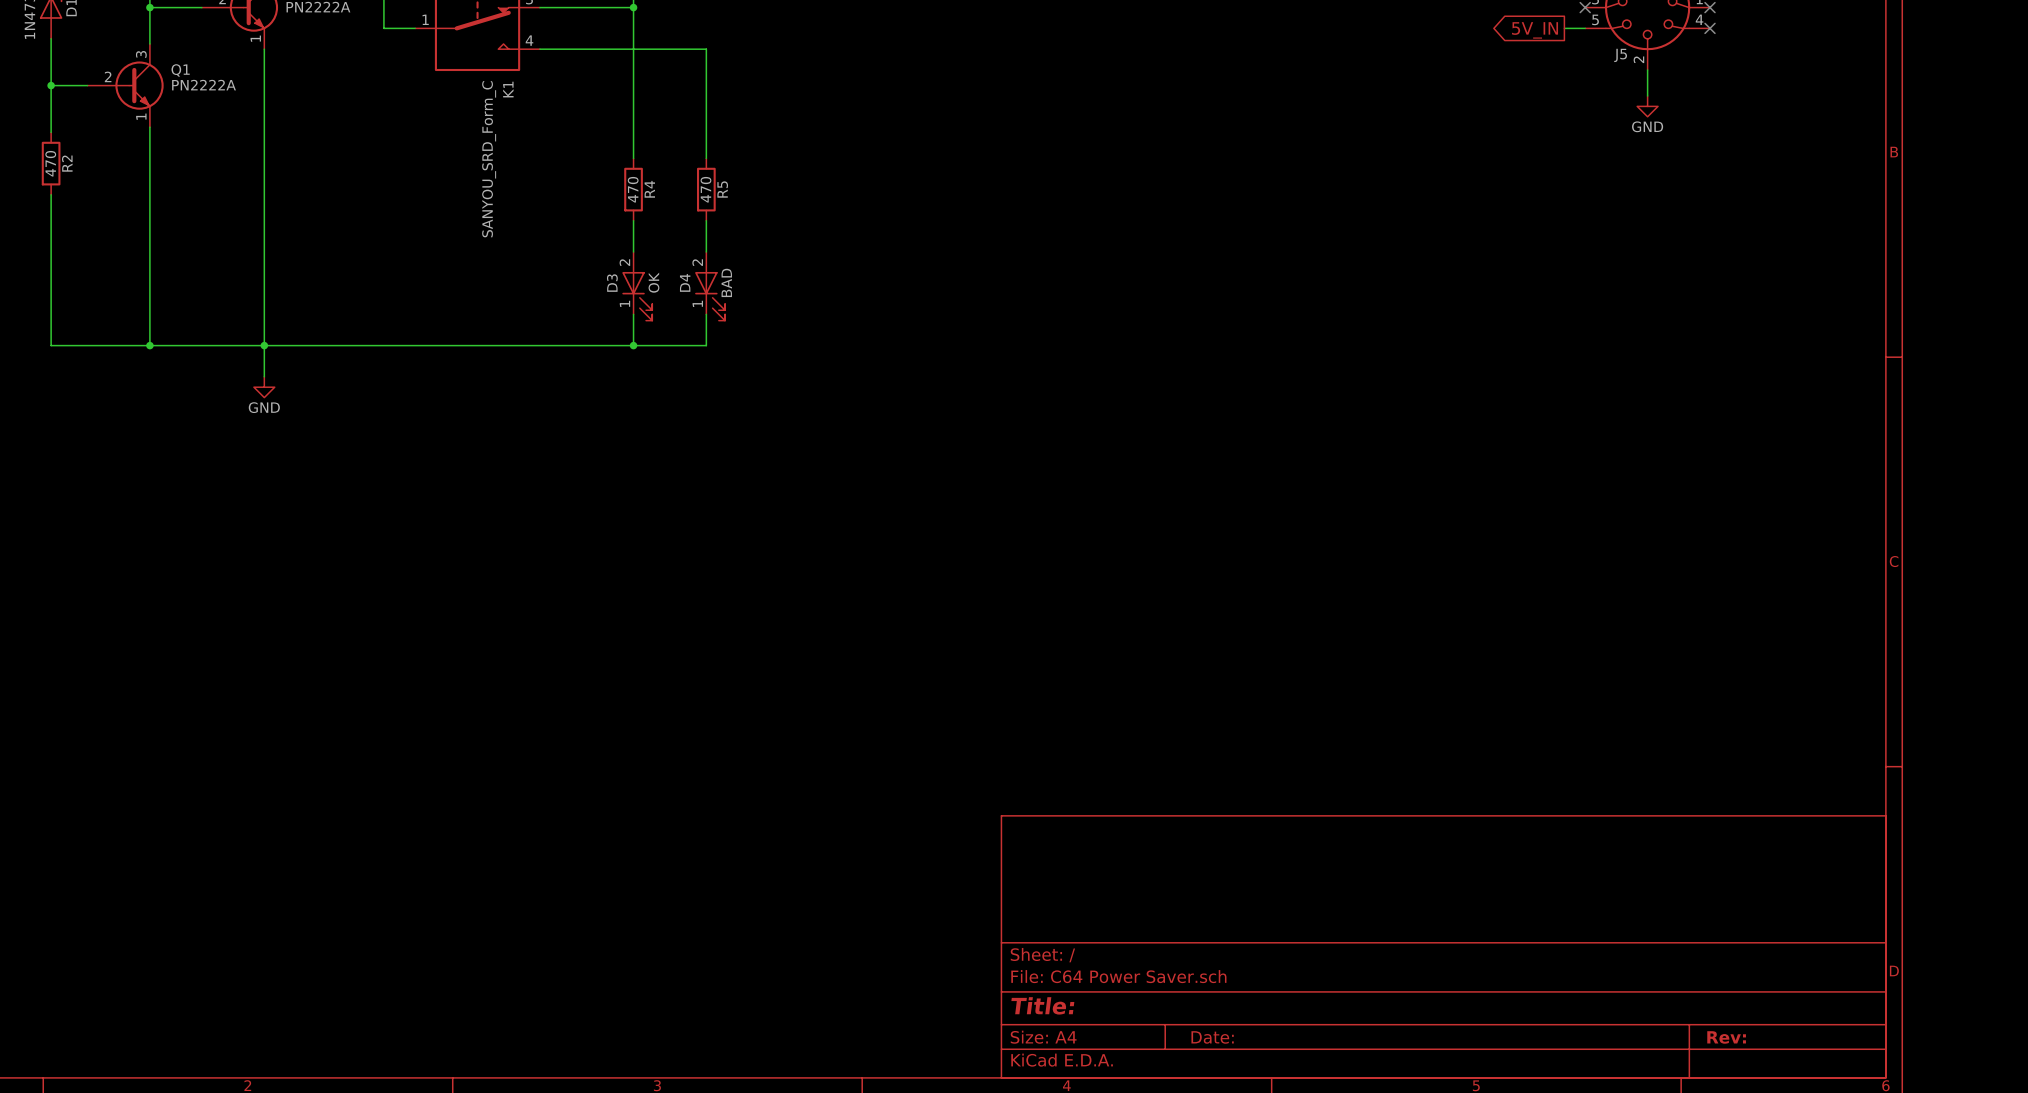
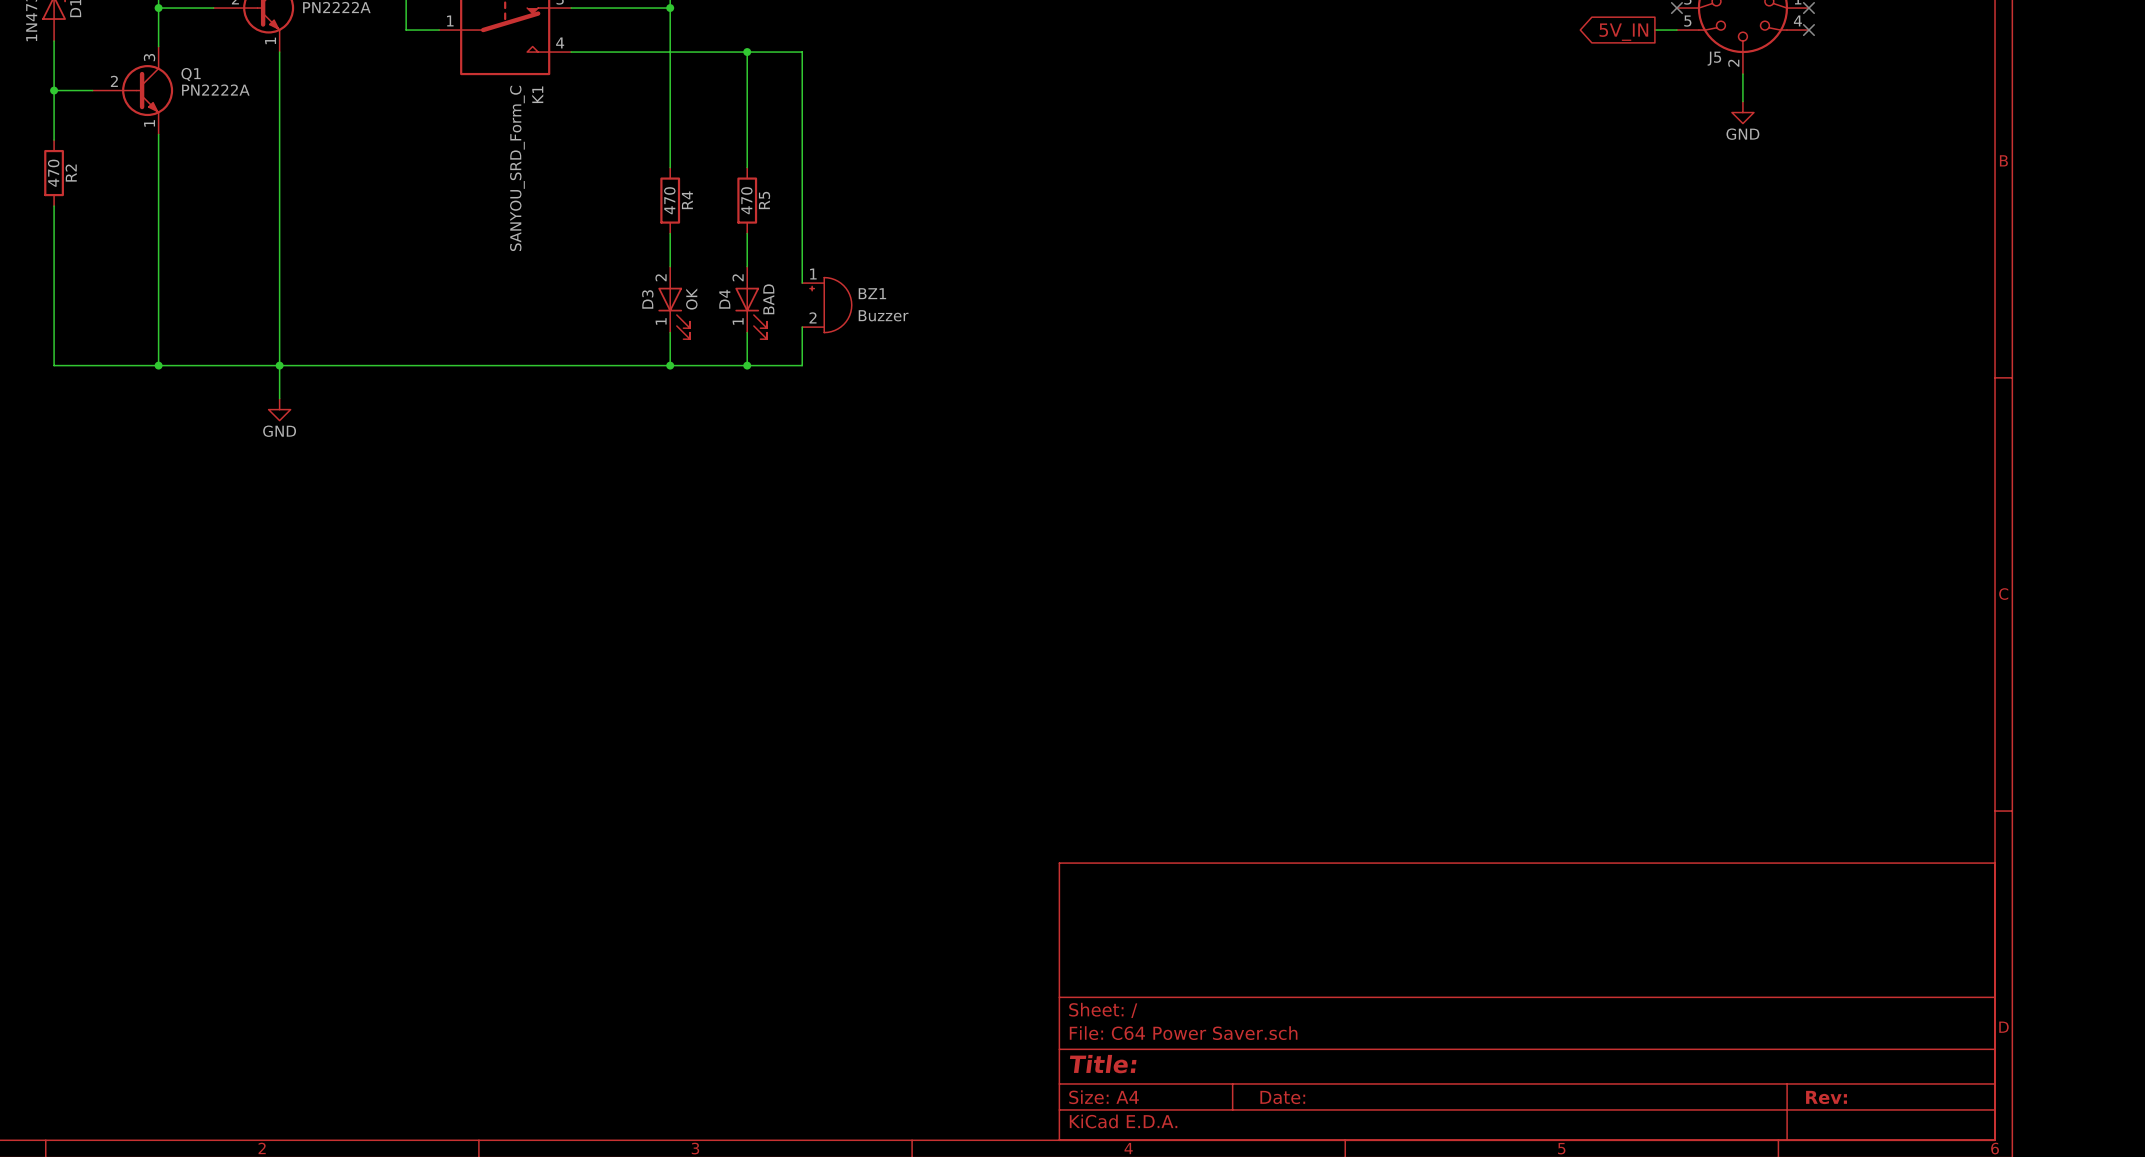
wire: none -> (747, 52) (802, 52) (802, 283)
junction: none -> (747, 52)
BZ1: none -> Buzzer (826, 305)
wire: none -> (802, 327) (802, 365) (747, 365)
junction: none -> (747, 365)

